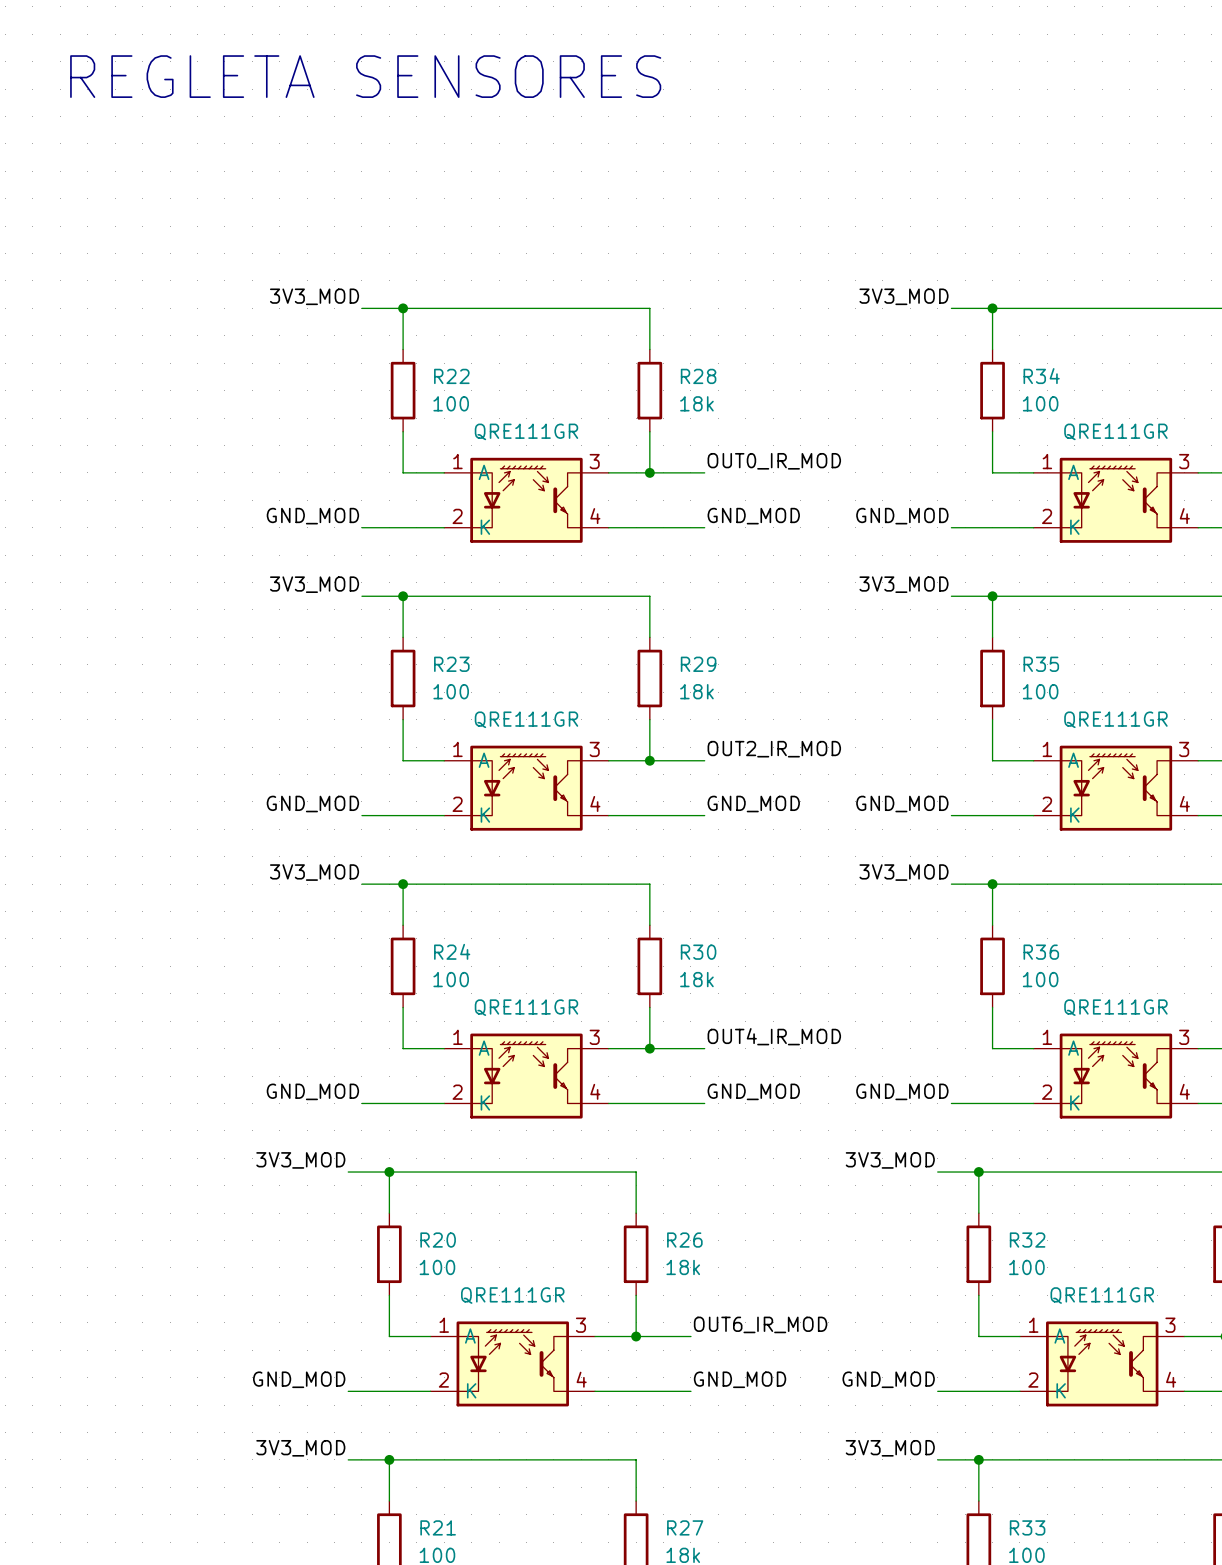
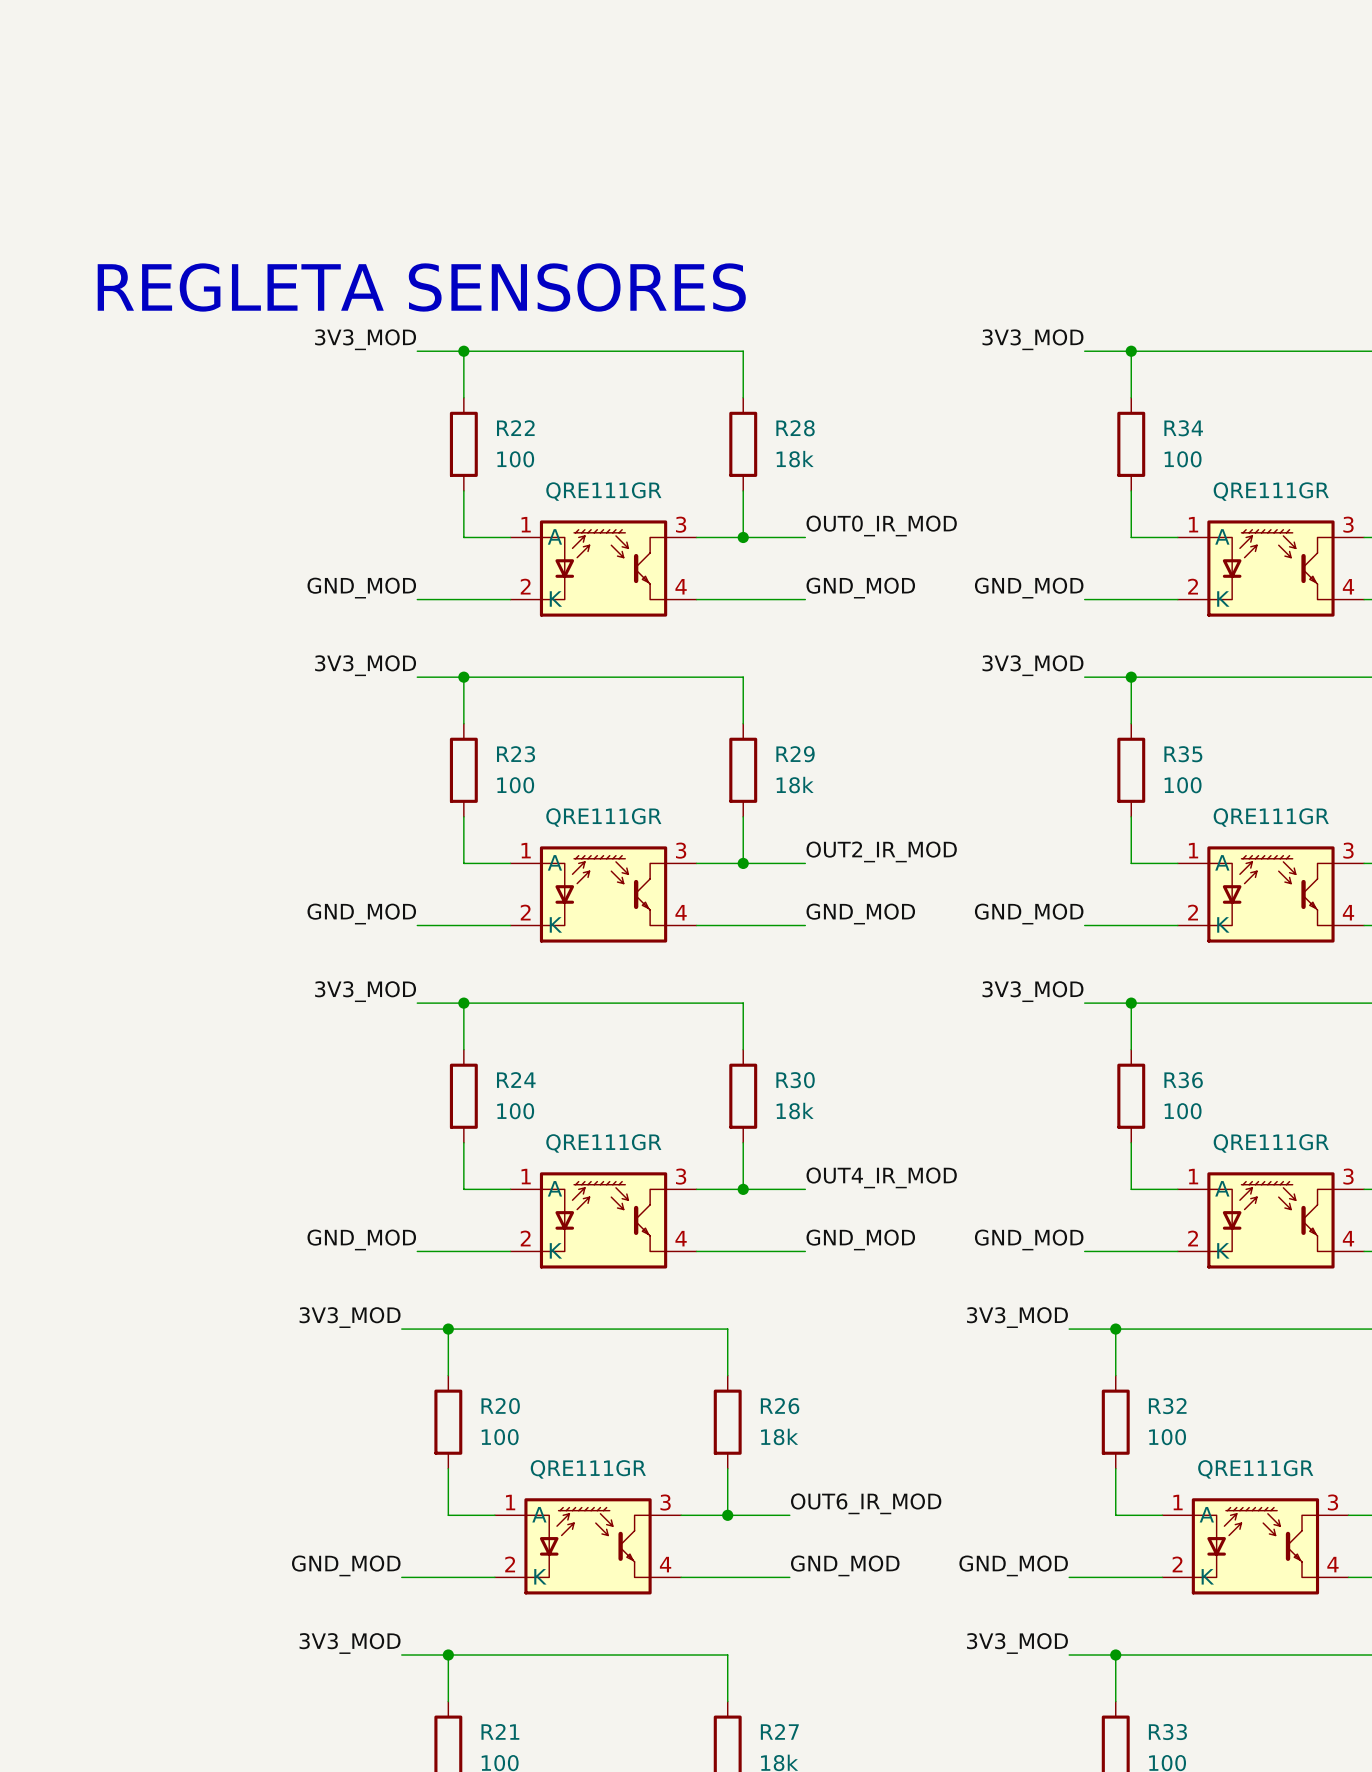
text position: REGLETA SENSORES (365, 76) -> REGLETA SENSORES (421, 287)

